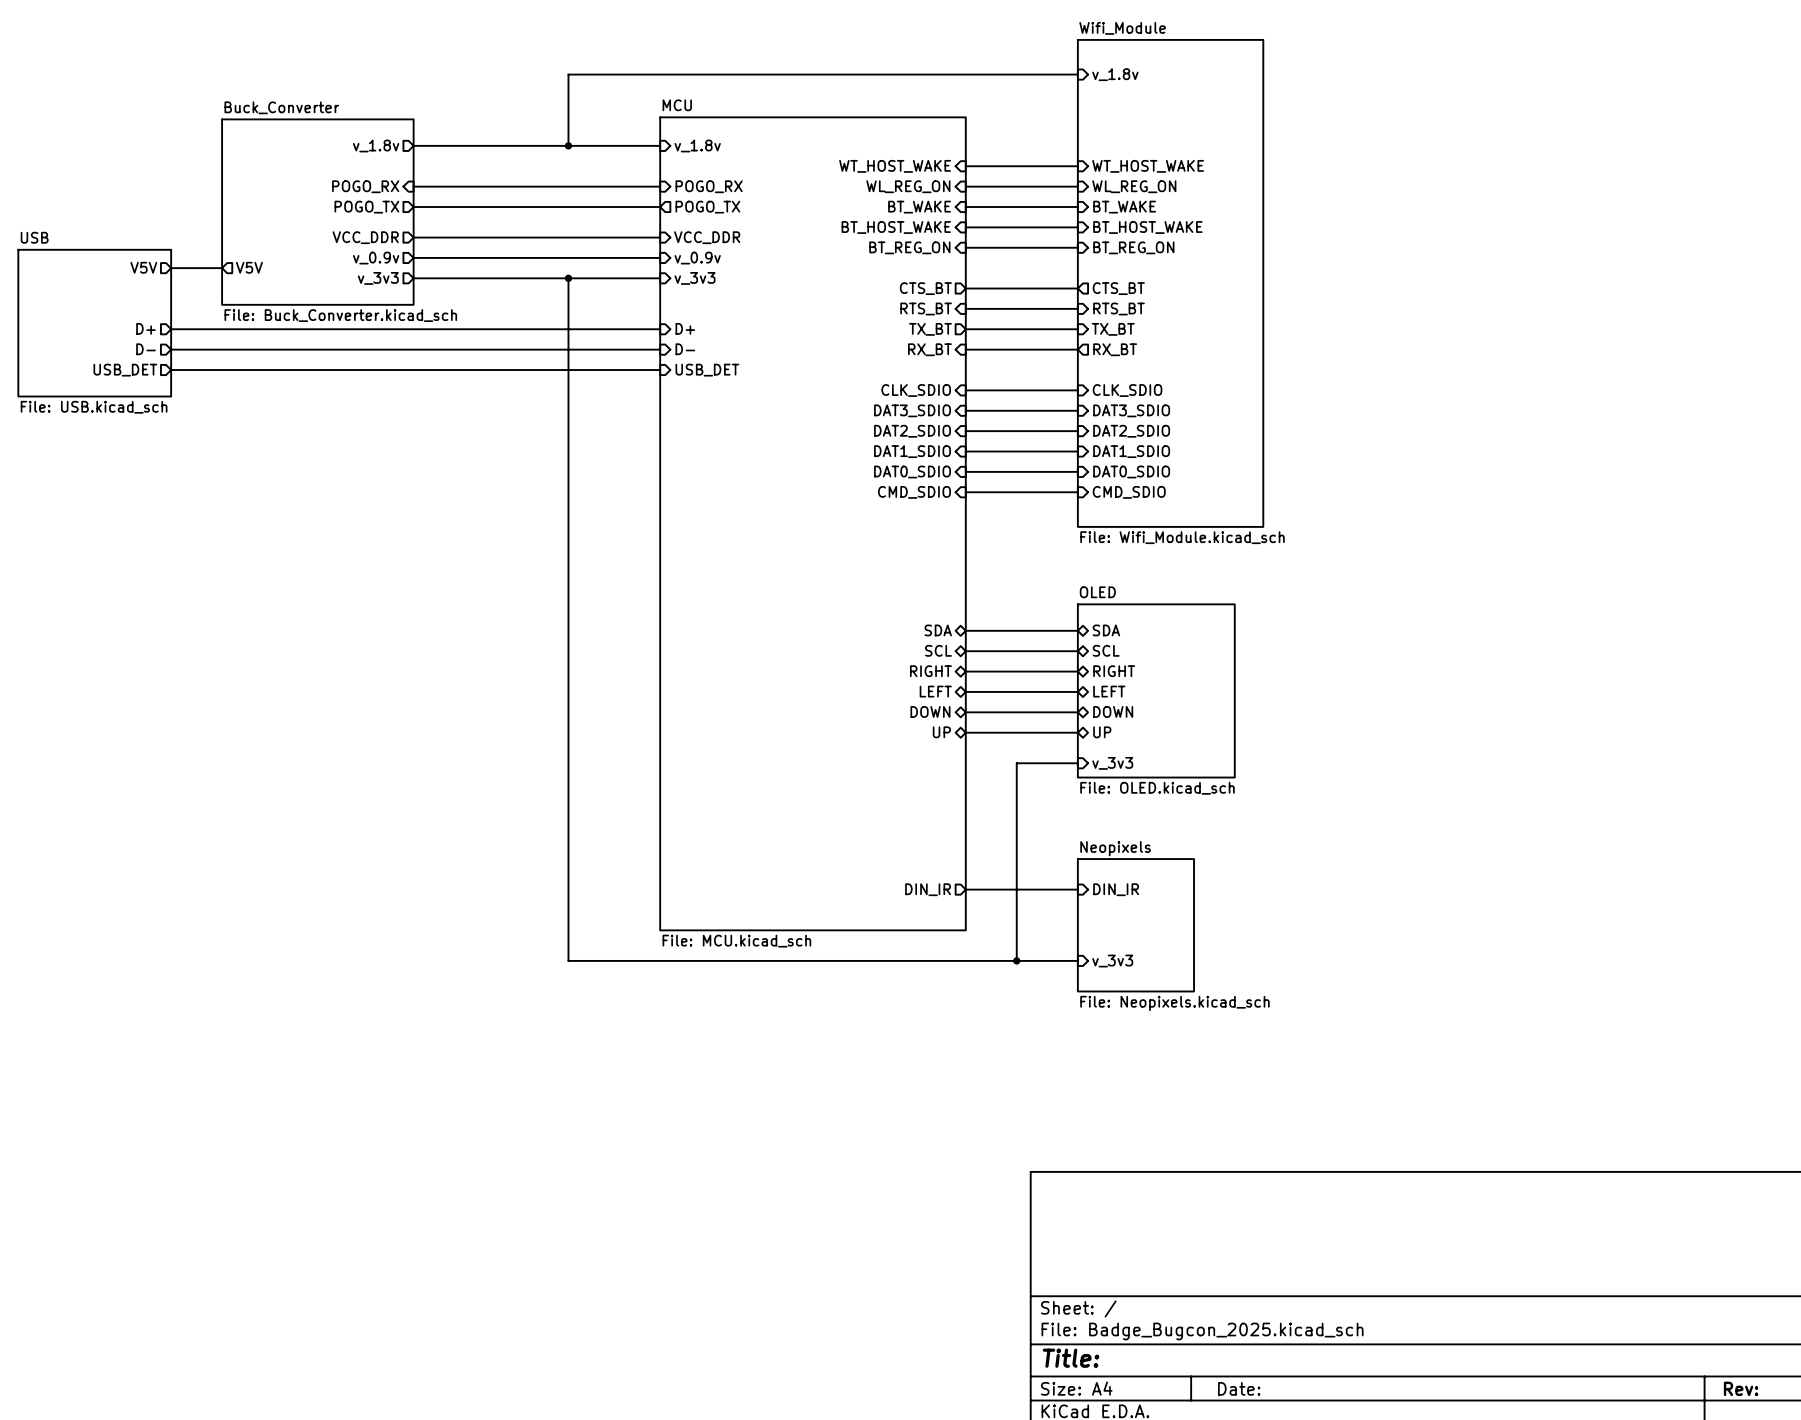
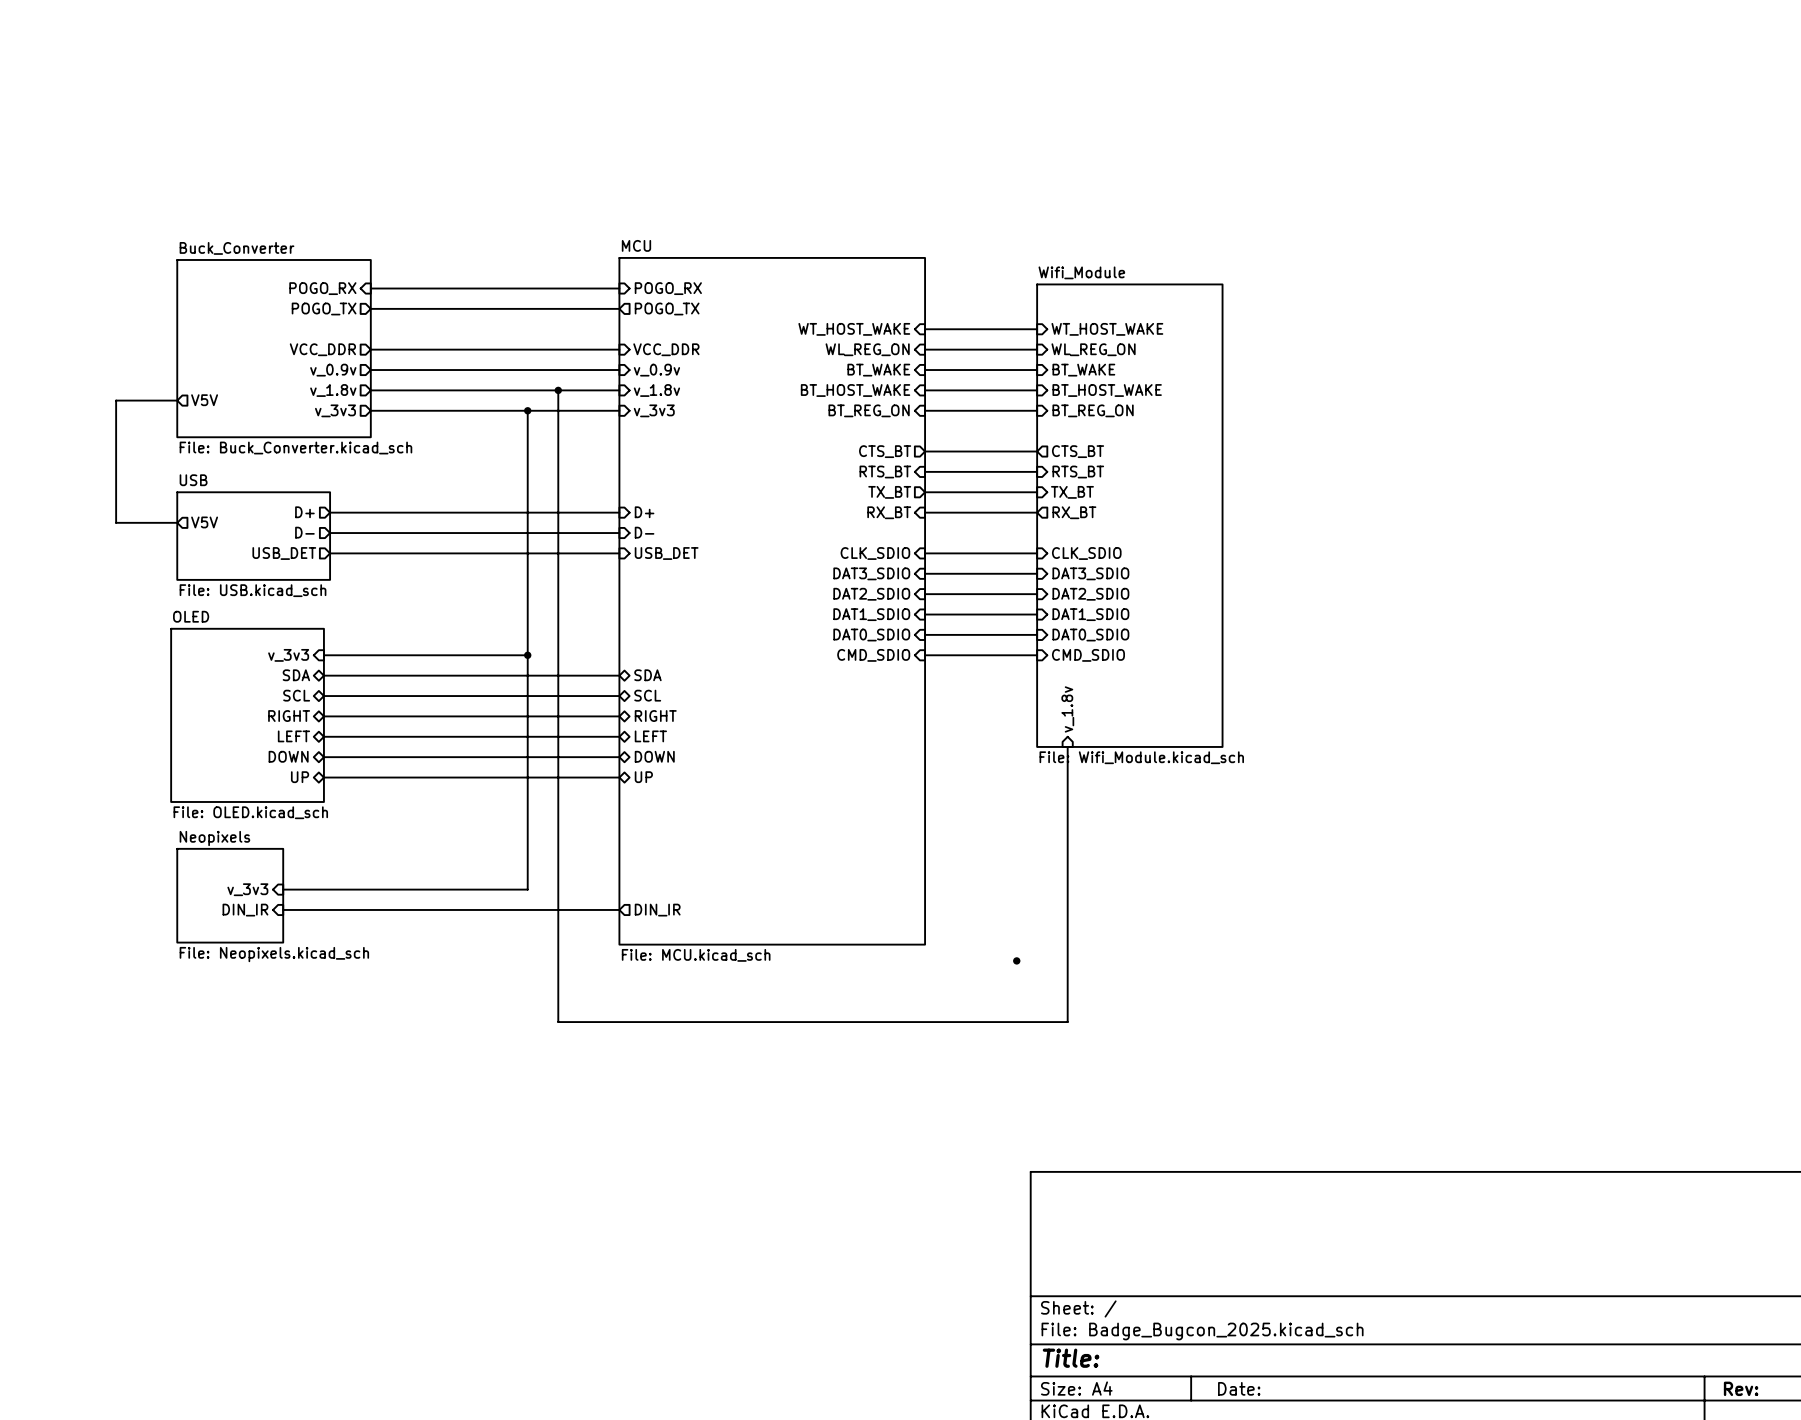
wire: (1077, 74) (568, 74) (568, 145) -> none
sheet pin: v_1.8v (1115, 74) -> none
sheet pin: v_1.8v (376, 145) -> none
wire: (413, 145) (660, 145) -> none
junction: (568, 145) -> none
sheet pin: v_1.8v (697, 145) -> none
sheet pin: WT_HOST_WAKE (895, 166) -> none
wire: (965, 166) (1077, 166) -> none
sheet pin: WT_HOST_WAKE (1148, 166) -> none
sheet pin position: POGO_RX (365, 186) -> POGO_RX (322, 288)
wire: (413, 186) (660, 186) -> none
sheet pin position: POGO_RX (709, 186) -> POGO_RX (668, 288)
sheet pin: WL_REG_ON (908, 186) -> none
wire: (965, 186) (1077, 186) -> none
sheet pin: WL_REG_ON (1134, 186) -> none
sheet pin position: POGO_TX (366, 207) -> POGO_TX (324, 308)
wire: (413, 207) (660, 207) -> none
sheet pin position: POGO_TX (707, 207) -> POGO_TX (667, 308)
sheet pin: BT_WAKE (919, 207) -> none
wire: (965, 207) (1077, 207) -> none
sheet pin: BT_WAKE (1124, 207) -> none
sheet Buck_Converter: File: Buck_Converter.kicad_sch (317, 212) -> none
sheet pin: BT_HOST_WAKE (896, 227) -> none
wire: (965, 227) (1077, 227) -> none
sheet pin: BT_HOST_WAKE (1147, 227) -> none
sheet pin position: VCC_DDR (365, 237) -> VCC_DDR (322, 349)
wire: (413, 237) (660, 237) -> none
sheet pin position: VCC_DDR (707, 237) -> VCC_DDR (666, 349)
sheet pin: BT_REG_ON (909, 247) -> none
wire: (965, 247) (1077, 247) -> none
sheet pin: BT_REG_ON (1133, 247) -> none
wire: (413, 257) (660, 257) -> none
sheet pin position: v_0.9v (376, 258) -> v_0.9v (333, 370)
sheet pin position: v_0.9v (697, 258) -> v_0.9v (656, 370)
sheet pin: V5V (143, 267) -> none
sheet pin: V5V (249, 267) -> none
wire: (171, 268) (222, 268) -> none
sheet pin: v_3v3 (378, 278) -> none
wire: (413, 278) (660, 278) -> none
wire: (568, 278) (568, 960) (1077, 960) -> none
junction: (568, 278) -> none
sheet pin: v_3v3 (695, 278) -> none
sheet Wifi_Module: File: Wifi_Module.kicad_sch (1170, 283) -> none
wire: none -> (370, 288) (619, 288)
sheet pin: CTS_BT (925, 288) -> none
wire: (965, 288) (1077, 288) -> (925, 370) (1037, 370)
sheet pin: CTS_BT (1118, 288) -> none
wire: none -> (370, 308) (619, 308)
sheet pin: RTS_BT (926, 308) -> none
wire: (965, 308) (1077, 308) -> none
sheet pin: RTS_BT (1119, 308) -> none
sheet USB: File: USB.kicad_sch (94, 323) -> none
sheet pin: D+ (146, 328) -> none
sheet pin position: D+ (685, 328) -> D+ (644, 512)
wire: (171, 329) (660, 329) -> none
sheet pin: none -> WT_HOST_WAKE (854, 329)
sheet pin: TX_BT (930, 329) -> none
wire: (1037, 329) (1077, 329) -> (925, 329) (965, 329)
sheet pin: none -> WT_HOST_WAKE (1107, 329)
sheet pin: TX_BT (1113, 329) -> none
sheet Buck_Converter: none -> File: Buck_Converter.kicad_sch (274, 348)
sheet pin: D- (146, 349) -> none
wire: (171, 349) (370, 349) -> none
wire: (619, 349) (660, 349) -> none
sheet pin position: D- (685, 349) -> D- (644, 532)
sheet pin: none -> WL_REG_ON (867, 349)
sheet pin: RX_BT (929, 349) -> none
wire: (1037, 349) (1077, 349) -> (925, 349) (965, 349)
sheet pin: none -> WL_REG_ON (1093, 349)
sheet pin: RX_BT (1115, 349) -> none
sheet pin: USB_DET (125, 370) -> none
wire: (171, 370) (370, 370) -> none
wire: (619, 370) (660, 370) -> none
sheet pin position: USB_DET (707, 370) -> USB_DET (666, 553)
sheet pin: none -> BT_WAKE (878, 370)
sheet pin: none -> BT_WAKE (1083, 370)
sheet pin: none -> v_1.8v (333, 390)
wire: none -> (370, 390) (619, 390)
wire: none -> (558, 390) (558, 1022) (1067, 1022) (1067, 746)
junction: none -> (558, 390)
sheet pin: none -> v_1.8v (656, 390)
sheet pin: none -> BT_HOST_WAKE (855, 390)
sheet pin: CLK_SDIO (916, 390) -> none
wire: (1037, 390) (1077, 390) -> (925, 390) (965, 390)
sheet pin: none -> BT_HOST_WAKE (1107, 390)
sheet pin: CLK_SDIO (1127, 390) -> none
wire: none -> (177, 400) (116, 400) (116, 522) (177, 522)
sheet pin: none -> V5V (204, 400)
sheet pin: none -> v_3v3 (335, 410)
wire: none -> (370, 410) (619, 410)
wire: none -> (527, 410) (527, 889) (283, 889)
junction: none -> (527, 410)
sheet pin: none -> v_3v3 (654, 410)
sheet pin: none -> BT_REG_ON (869, 410)
sheet pin: DAT3_SDIO (912, 410) -> none
wire: (1037, 410) (1077, 410) -> (925, 410) (965, 410)
sheet pin: none -> BT_REG_ON (1093, 410)
sheet pin: DAT3_SDIO (1131, 410) -> none
sheet pin: DAT2_SDIO (912, 431) -> none
wire: (965, 431) (1077, 431) -> (925, 512) (1037, 512)
sheet pin: DAT2_SDIO (1131, 431) -> none
sheet pin: none -> CTS_BT (885, 451)
sheet pin: DAT1_SDIO (912, 451) -> none
wire: (1037, 451) (1077, 451) -> (925, 451) (965, 451)
sheet pin: none -> CTS_BT (1078, 451)
sheet pin: DAT1_SDIO (1131, 451) -> none
wire: (1037, 471) (1077, 471) -> (925, 471) (965, 471)
sheet pin: none -> RTS_BT (885, 472)
sheet pin: DAT0_SDIO (912, 472) -> none
sheet pin: none -> RTS_BT (1078, 472)
sheet pin: DAT0_SDIO (1131, 472) -> none
sheet pin: none -> TX_BT (889, 492)
sheet pin: CMD_SDIO (914, 492) -> none
wire: (1037, 492) (1077, 492) -> (925, 492) (965, 492)
sheet pin: none -> TX_BT (1072, 492)
sheet pin: CMD_SDIO (1129, 492) -> none
sheet pin: none -> D+ (304, 512)
wire: none -> (330, 512) (619, 512)
sheet pin: none -> RX_BT (889, 512)
sheet pin: none -> RX_BT (1074, 512)
sheet Wifi_Module: none -> File: Wifi_Module.kicad_sch (1129, 515)
sheet pin: none -> V5V (204, 522)
sheet MCU: File: MCU.kicad_sch (812, 523) -> none
sheet pin: none -> D- (304, 532)
wire: none -> (330, 533) (619, 533)
sheet USB: none -> File: USB.kicad_sch (253, 536)
sheet pin: none -> USB_DET (284, 553)
wire: none -> (330, 553) (619, 553)
sheet pin: none -> CLK_SDIO (875, 553)
sheet pin: none -> CLK_SDIO (1086, 553)
sheet pin: none -> DAT3_SDIO (871, 573)
sheet pin: none -> DAT3_SDIO (1090, 573)
sheet pin: none -> DAT2_SDIO (871, 594)
sheet pin: none -> DAT2_SDIO (1090, 594)
sheet MCU: none -> File: MCU.kicad_sch (772, 601)
sheet pin: none -> DAT1_SDIO (871, 614)
sheet pin: none -> DAT1_SDIO (1090, 614)
sheet pin: SDA (938, 630) -> none
wire: (965, 630) (1077, 630) -> (925, 553) (1037, 553)
sheet pin: SDA (1106, 630) -> none
sheet pin: none -> DAT0_SDIO (871, 635)
sheet pin: none -> DAT0_SDIO (1090, 635)
sheet pin: SCL (938, 650) -> none
sheet pin: SCL (1106, 650) -> none
wire: (965, 651) (1077, 651) -> (925, 573) (1037, 573)
sheet pin: none -> v_3v3 (288, 655)
wire: none -> (323, 655) (527, 655)
junction: none -> (527, 655)
sheet pin: none -> CMD_SDIO (873, 655)
sheet pin: none -> CMD_SDIO (1088, 655)
sheet pin: RIGHT (930, 671) -> none
wire: (965, 671) (1077, 671) -> (925, 594) (1037, 594)
sheet pin: RIGHT (1114, 671) -> none
sheet pin: none -> SDA (296, 675)
wire: none -> (323, 675) (619, 675)
sheet pin: none -> SDA (647, 675)
sheet OLED: File: OLED.kicad_sch (1156, 690) -> none
sheet pin: LEFT (935, 691) -> none
wire: (965, 691) (1077, 691) -> (925, 614) (1037, 614)
sheet pin: LEFT (1109, 691) -> none
sheet pin: none -> SCL (296, 695)
sheet pin: none -> SCL (647, 695)
wire: none -> (323, 696) (619, 696)
sheet pin: none -> v_1.8v (1067, 709)
sheet pin: DOWN (930, 711) -> none
sheet pin: DOWN (1113, 711) -> none
wire: (965, 712) (1077, 712) -> (925, 634) (1037, 634)
sheet OLED: none -> File: OLED.kicad_sch (247, 715)
sheet pin: none -> RIGHT (289, 716)
wire: none -> (323, 716) (619, 716)
sheet pin: none -> RIGHT (655, 716)
sheet pin: UP (941, 732) -> none
wire: (965, 732) (1077, 732) -> (925, 655) (1037, 655)
sheet pin: UP (1102, 732) -> none
sheet pin: none -> LEFT (293, 736)
wire: none -> (323, 736) (619, 736)
sheet pin: none -> LEFT (650, 736)
sheet pin: none -> DOWN (288, 756)
sheet pin: none -> DOWN (654, 756)
wire: none -> (323, 757) (619, 757)
wire: (1077, 763) (1016, 763) (1016, 960) -> none
sheet pin: v_3v3 (1112, 763) -> none
sheet pin: none -> UP (300, 777)
wire: none -> (323, 777) (619, 777)
sheet pin: none -> UP (643, 777)
sheet pin: none -> v_3v3 (247, 889)
sheet pin: DIN_IR (928, 889) -> none
wire: (965, 889) (1077, 889) -> none
sheet pin: DIN_IR (1116, 889) -> none
sheet Neopixels: none -> File: Neopixels.kicad_sch (230, 895)
wire: none -> (283, 909) (619, 909)
sheet pin: none -> DIN_IR (245, 910)
sheet pin: none -> DIN_IR (657, 910)
sheet Neopixels: File: Neopixels.kicad_sch (1135, 925) -> none
sheet pin: v_3v3 (1112, 961) -> none

